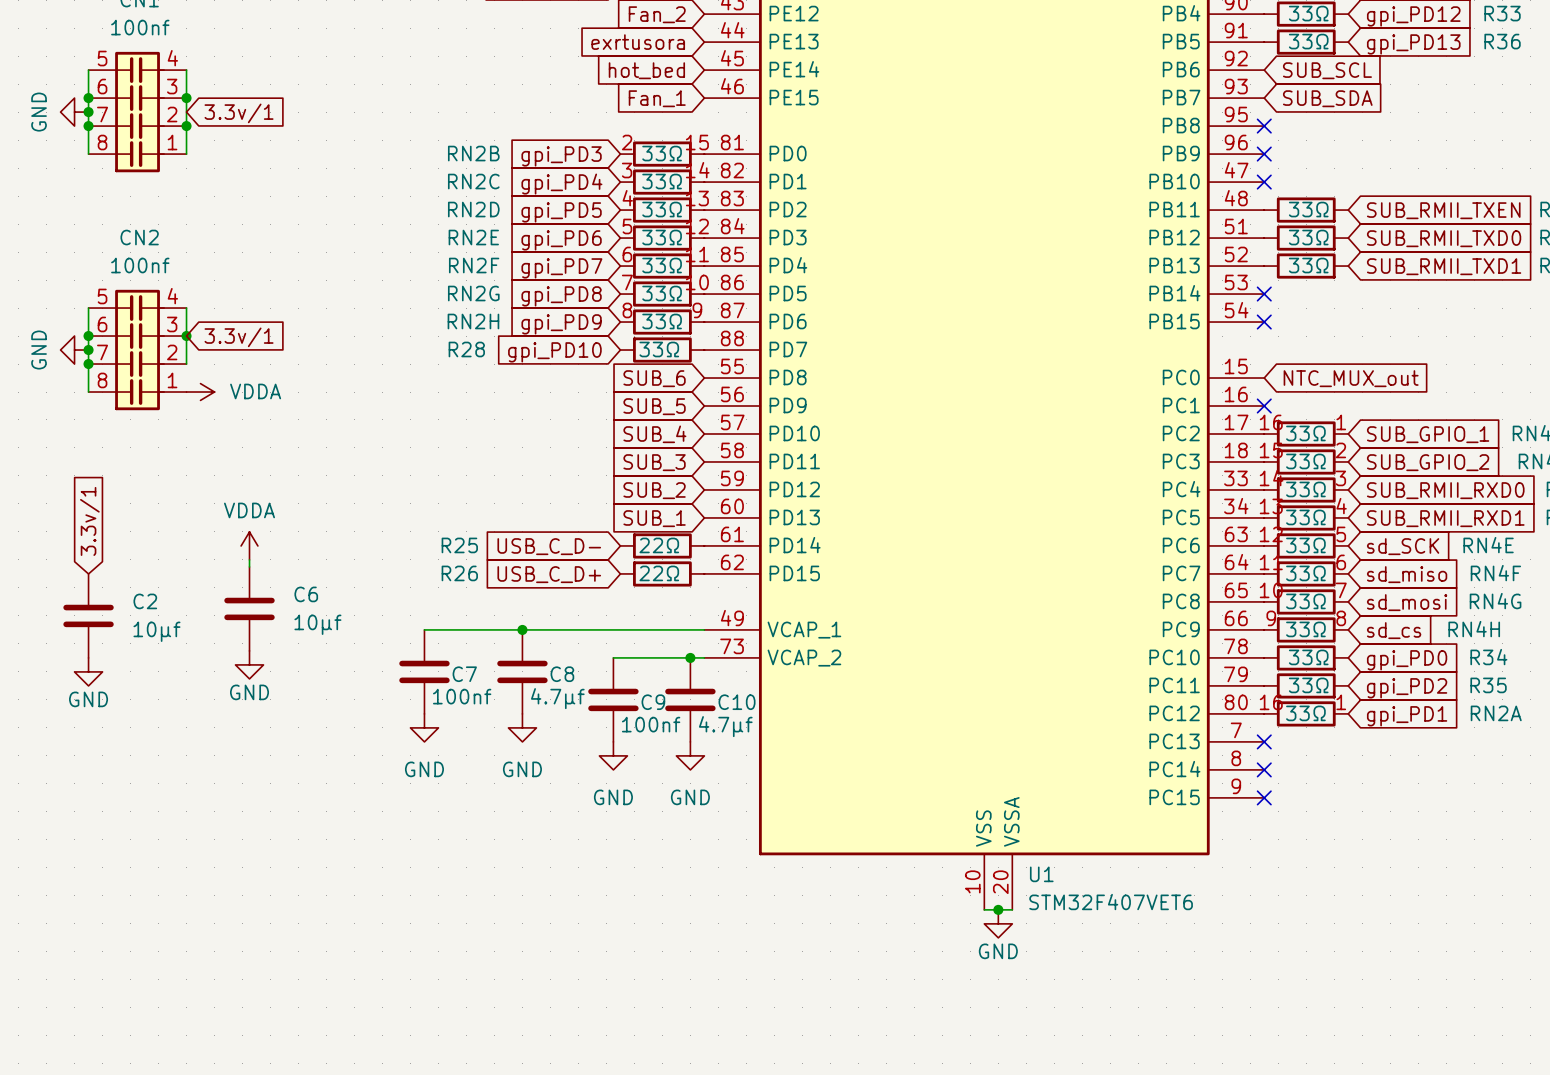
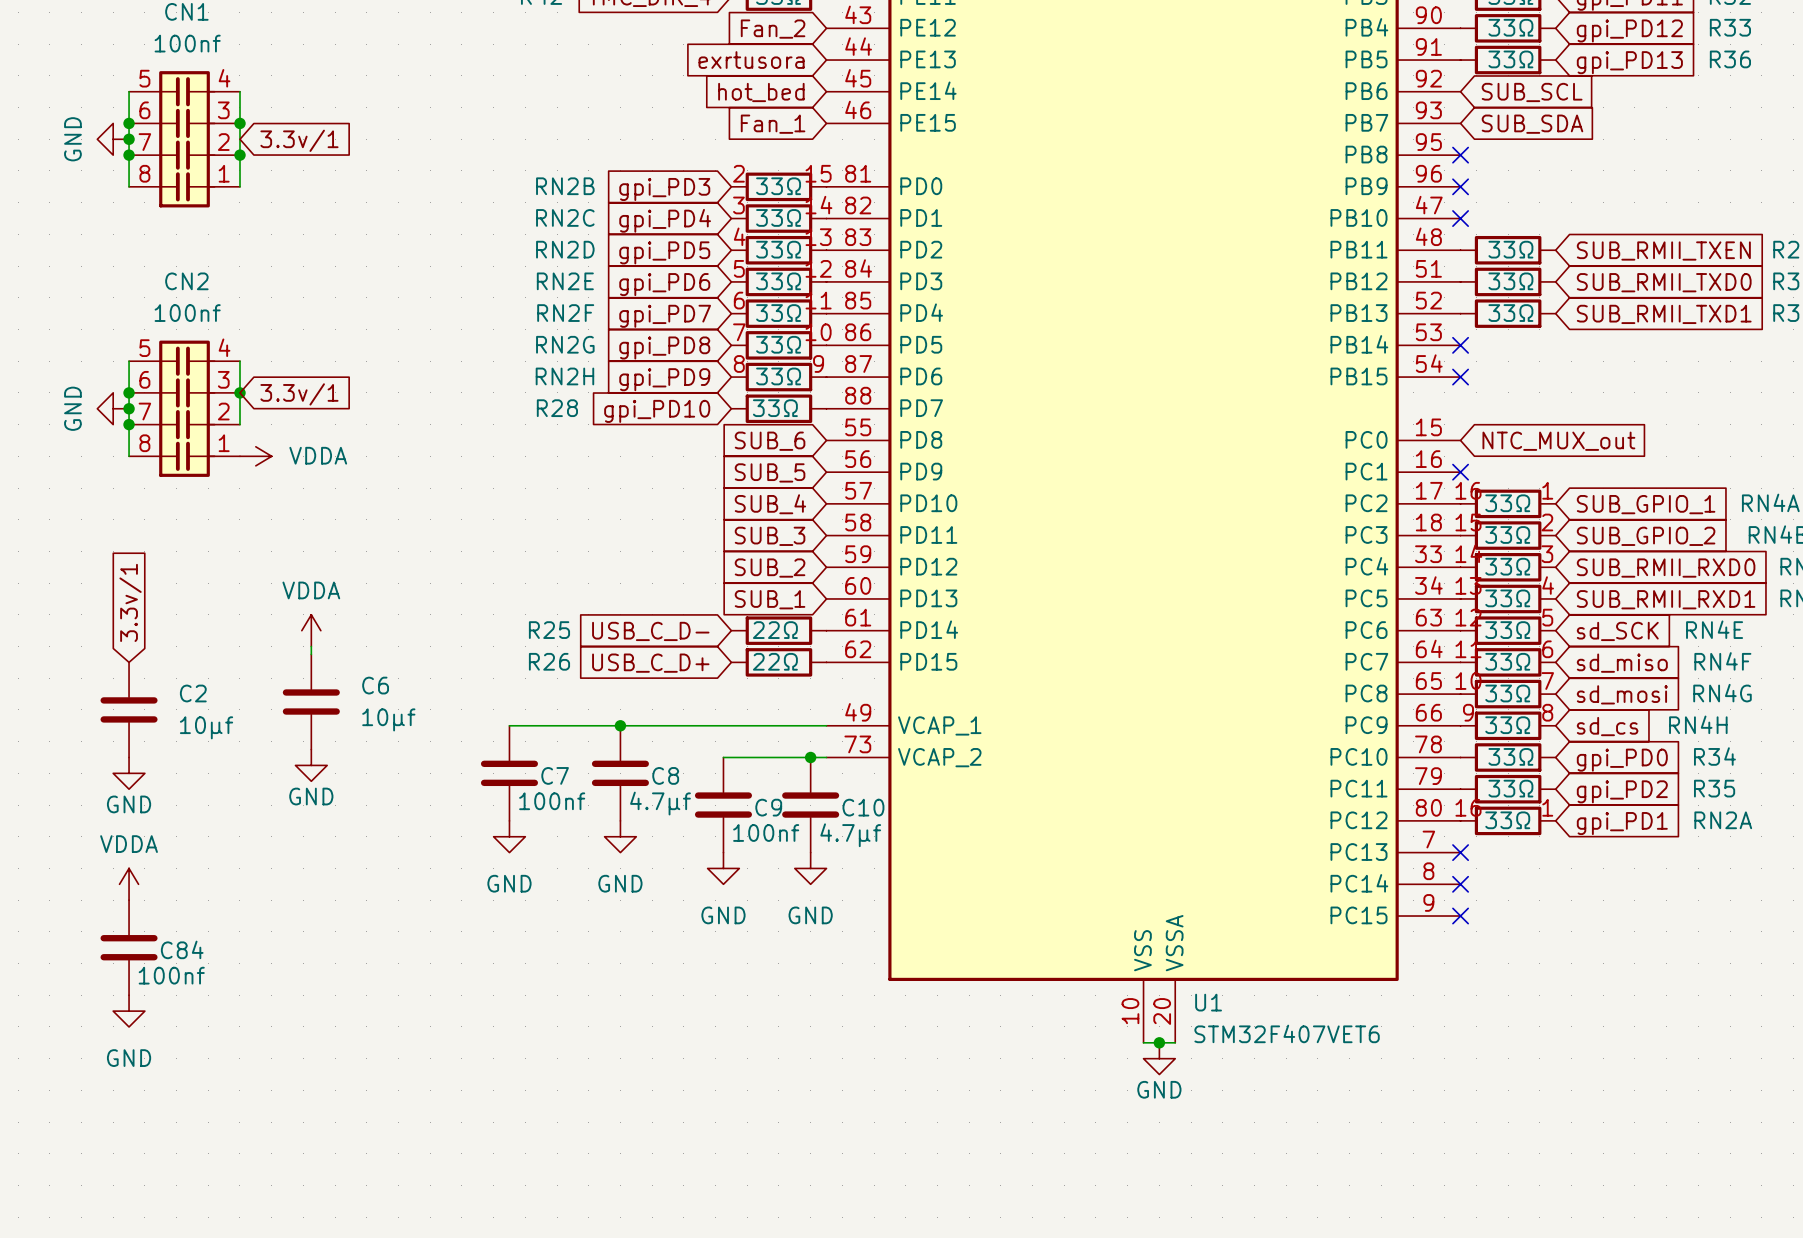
power symbol: none -> VDDA (129, 884)
C84: none -> 100nf (129, 947)
power symbol: none -> GND (129, 1011)

